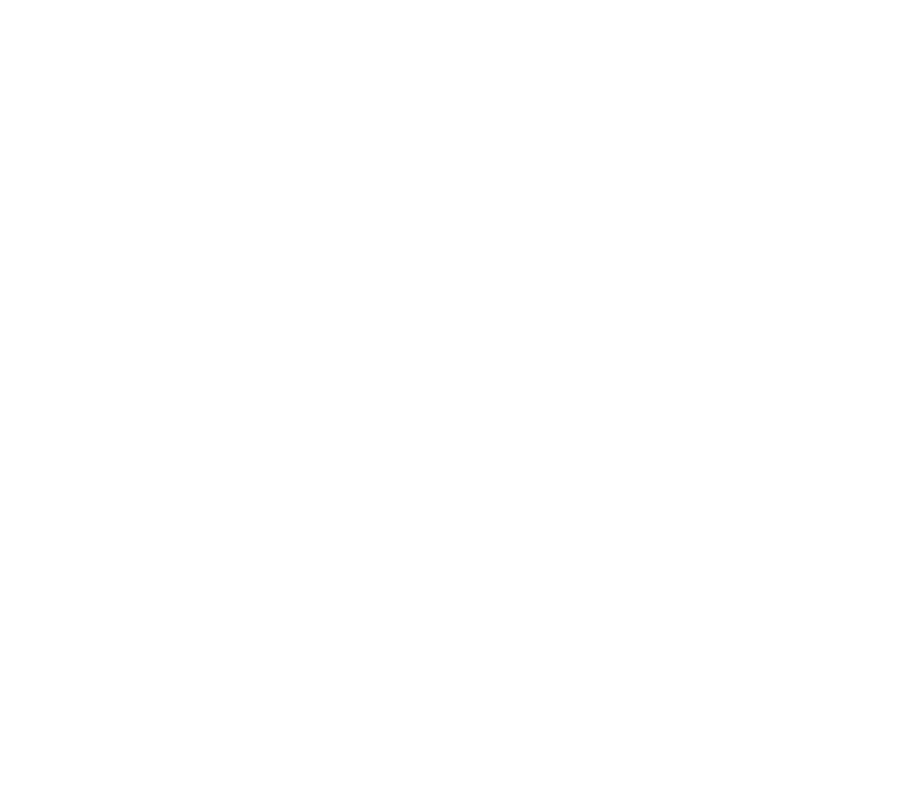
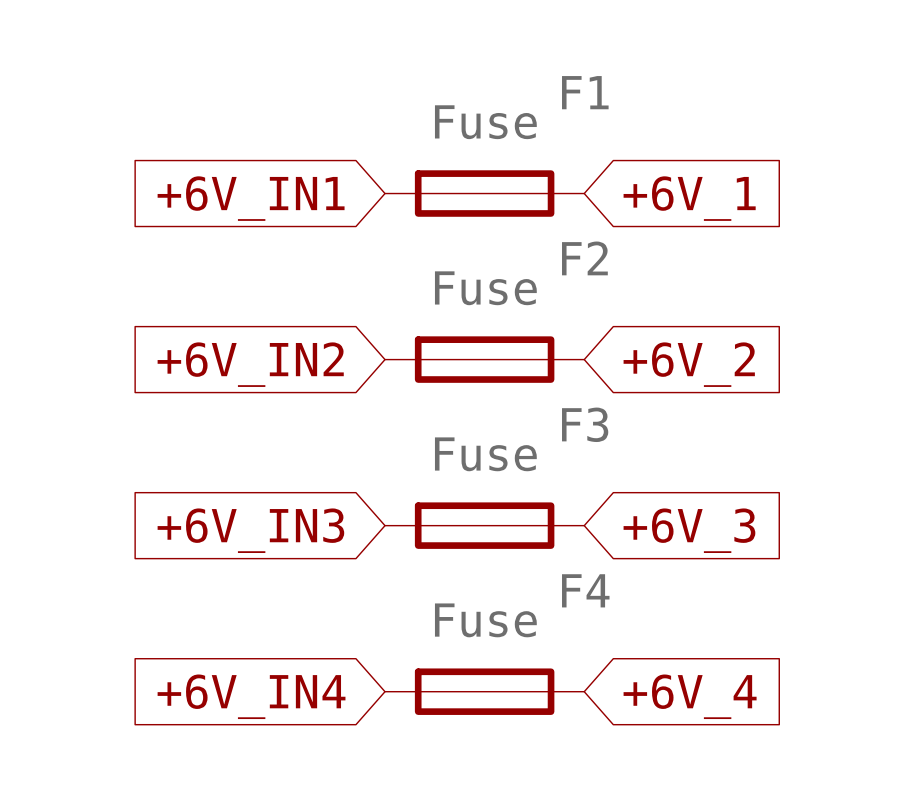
F1: none -> Fuse (484, 193)
global label: none -> +6V_IN1 (251, 198)
global label: none -> +6V_1 (689, 198)
F2: none -> Fuse (484, 359)
global label: none -> +6V_IN2 (250, 364)
global label: none -> +6V_2 (689, 364)
F3: none -> Fuse (484, 525)
global label: none -> +6V_IN3 (250, 530)
global label: none -> +6V_3 (689, 530)
F4: none -> Fuse (484, 691)
global label: none -> +6V_IN4 (251, 696)
global label: none -> +6V_4 (690, 696)

